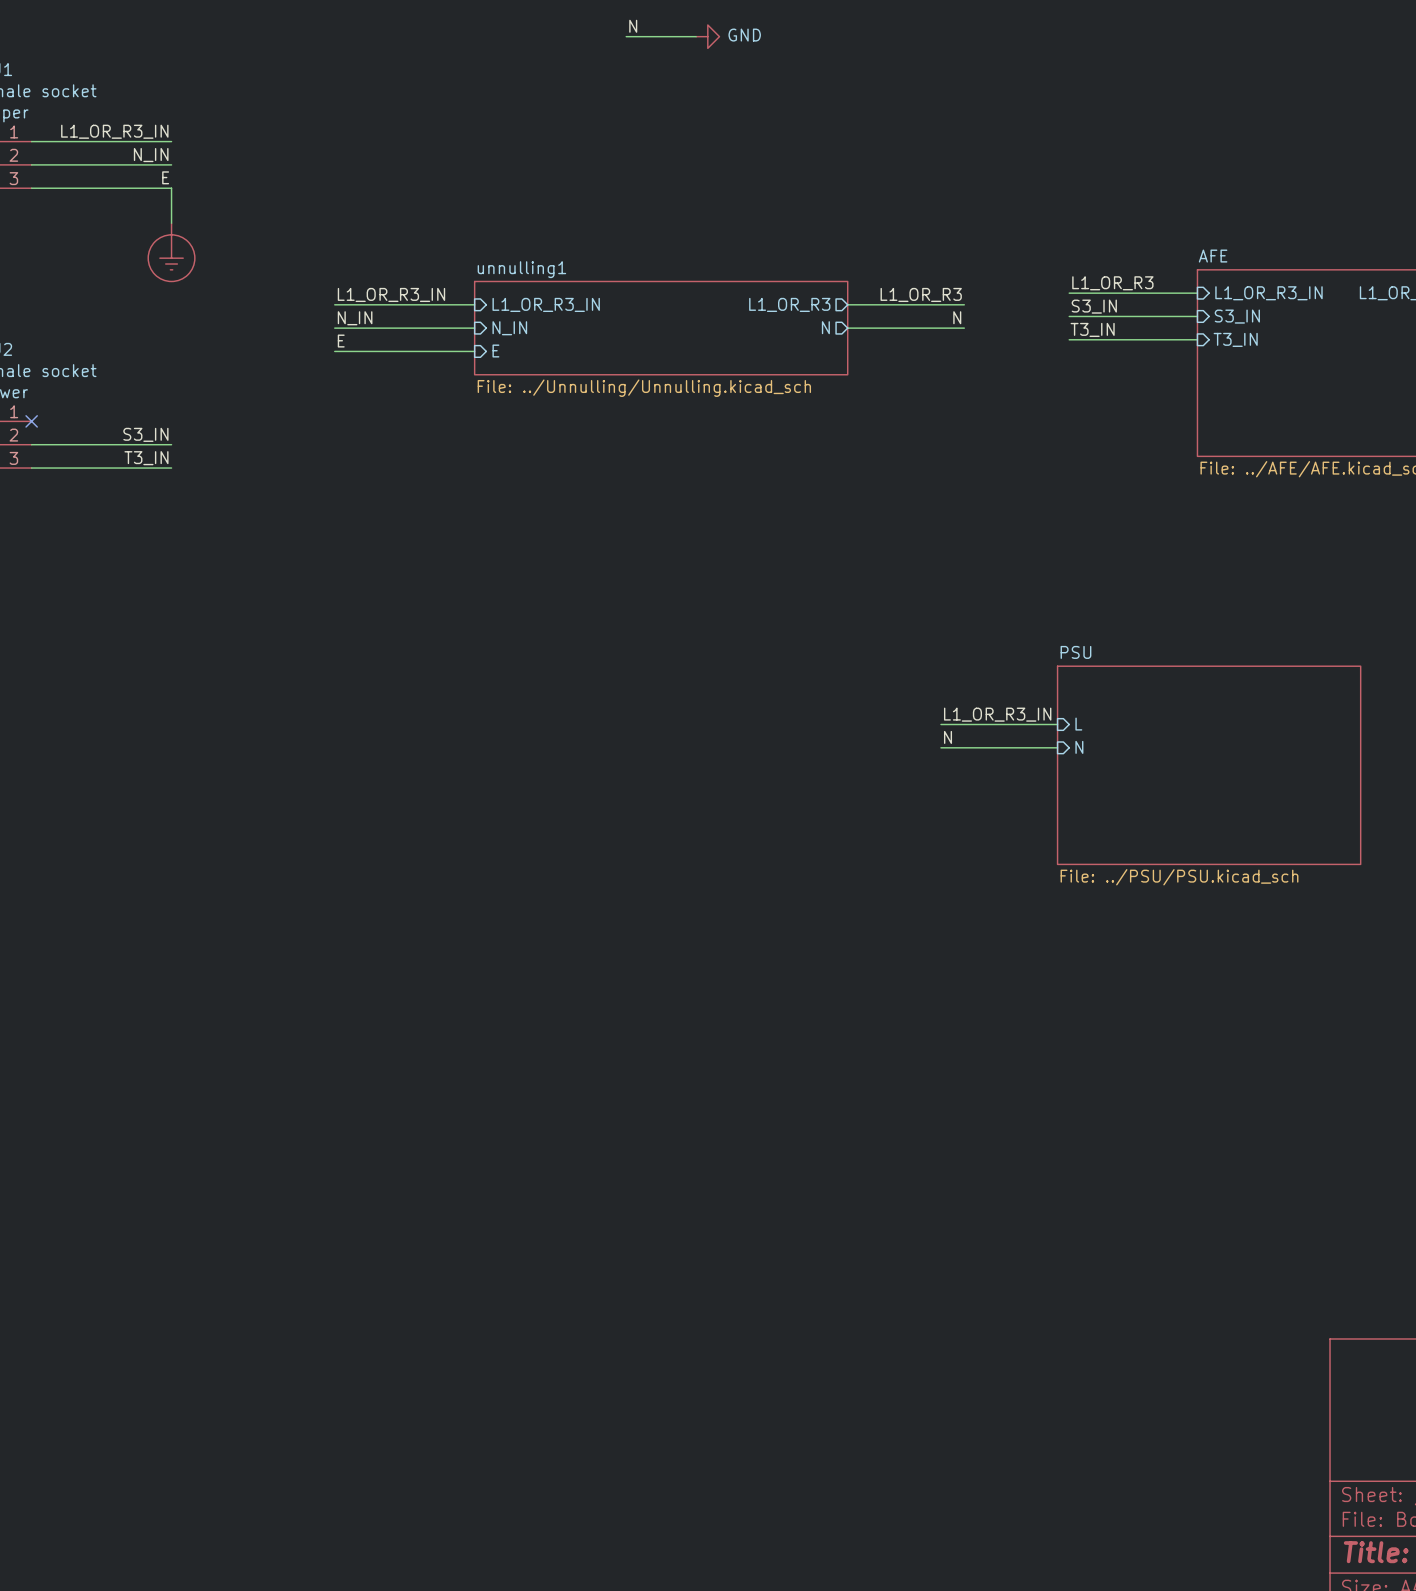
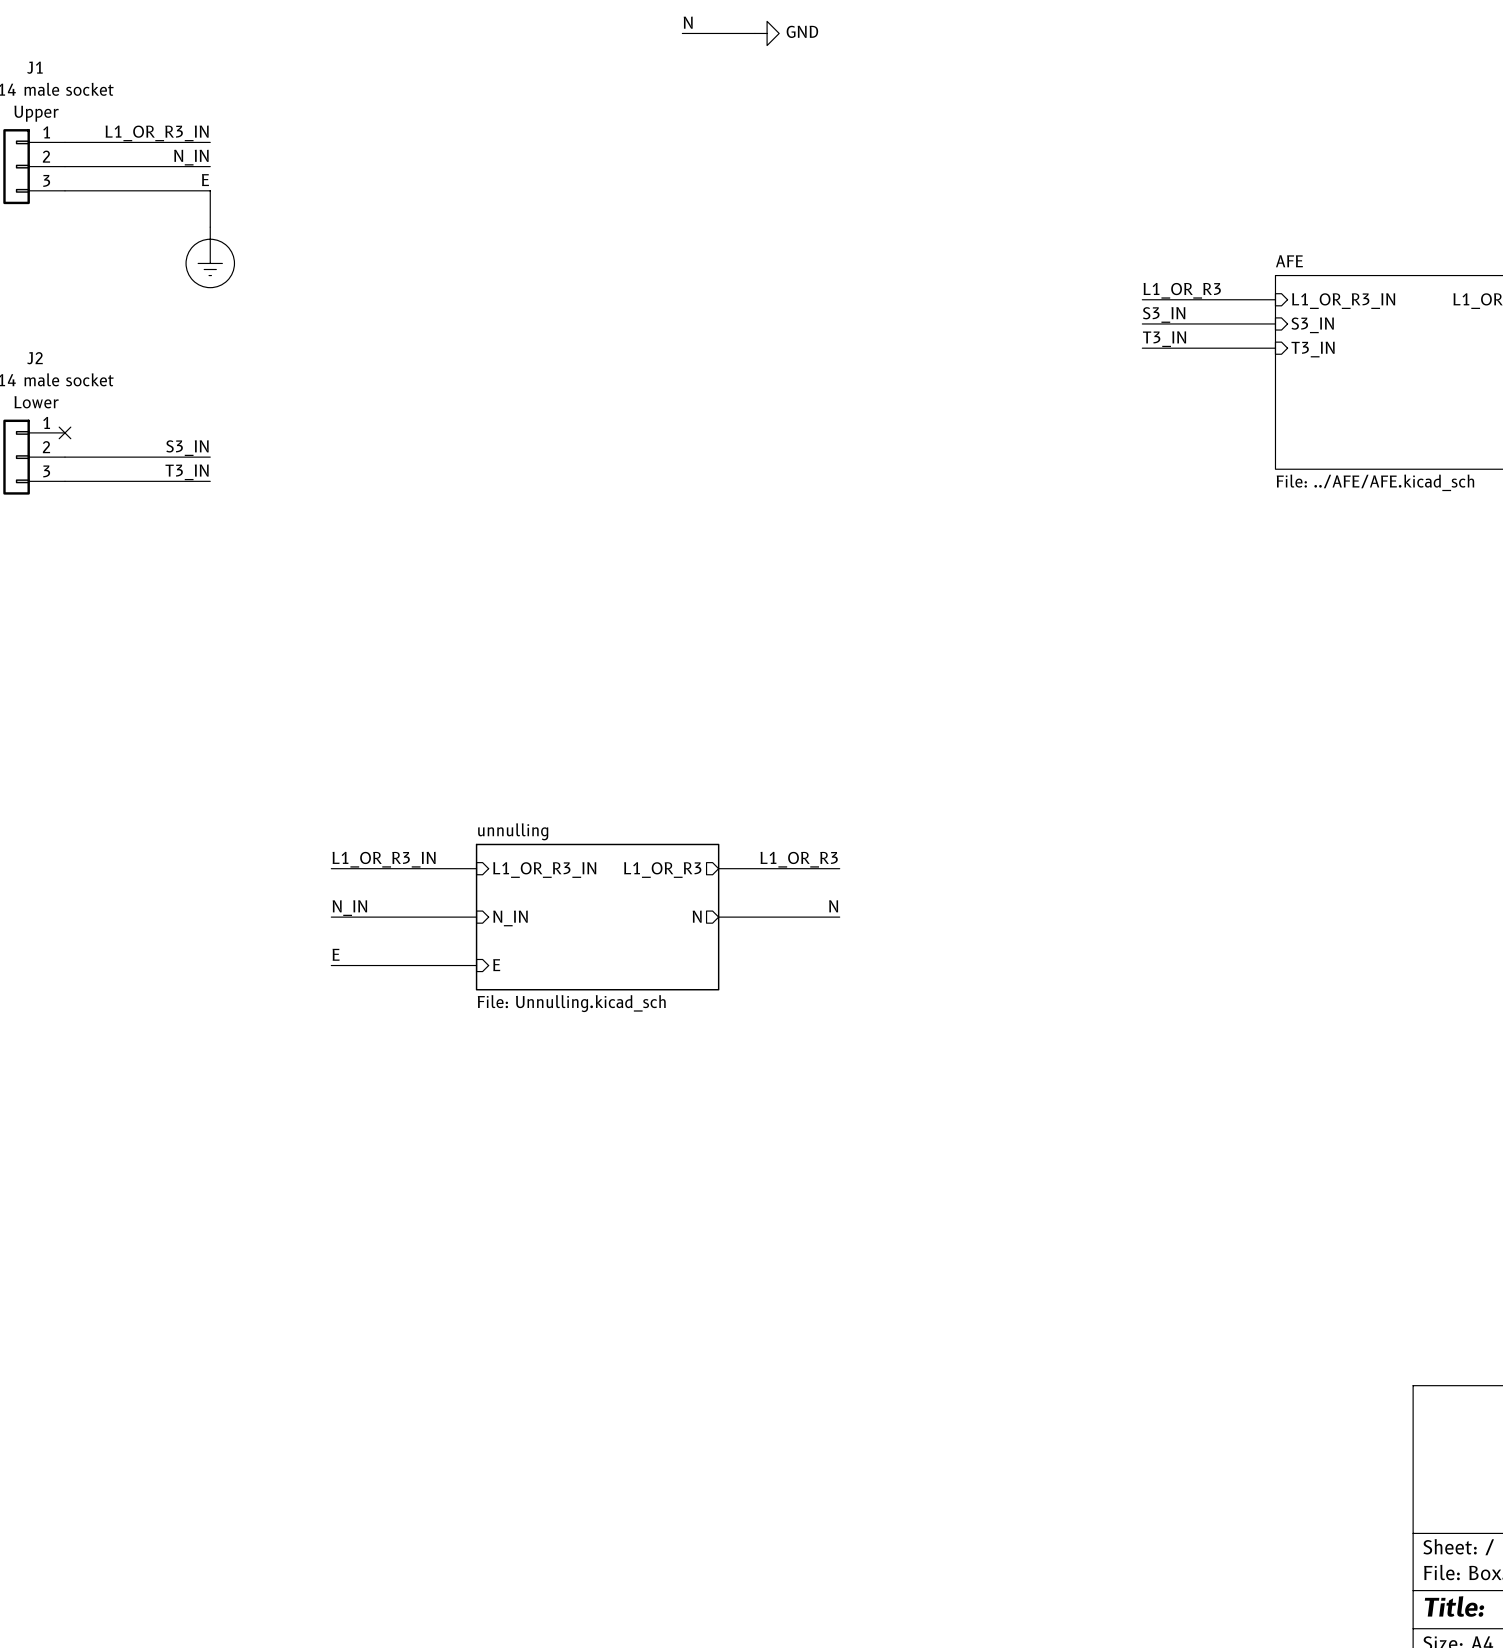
label: L1_OR_R3_IN (391, 294) -> none
label: L1_OR_R3 (921, 294) -> none
wire: (334, 304) (474, 304) -> none
sheet pin: L1_OR_R3_IN (546, 304) -> none
sheet pin: L1_OR_R3 (789, 304) -> none
wire: (847, 304) (964, 304) -> none
label: N (957, 317) -> none
label: N_IN (355, 318) -> none
sheet pin: N (825, 327) -> none
wire: (334, 328) (474, 328) -> none
sheet pin: N_IN (509, 328) -> none
sheet unnulling1: File: ../Unnulling/Unnulling.kicad_sch (661, 328) -> none
wire: (847, 328) (964, 328) -> none
label: E (341, 341) -> none
wire: (334, 351) (474, 351) -> none
sheet pin: E (495, 351) -> none
label: L1_OR_R3_IN (997, 714) -> none
wire: (940, 724) (1057, 724) -> none
sheet pin: L (1078, 724) -> none
label position: N (948, 737) -> N (833, 906)
wire: (940, 747) (1057, 747) -> none
sheet pin: N (1079, 747) -> none
sheet PSU: File: ../PSU/PSU.kicad_sch (1209, 765) -> none
label: none -> L1_OR_R3_IN (384, 859)
label: none -> L1_OR_R3 (799, 859)
wire: none -> (331, 868) (476, 868)
sheet pin: none -> L1_OR_R3_IN (544, 870)
sheet pin: none -> L1_OR_R3 (662, 870)
wire: none -> (718, 868) (839, 868)
label: none -> N_IN (349, 908)
wire: none -> (331, 917) (476, 917)
sheet pin: none -> N_IN (510, 918)
sheet unnulling: none -> File: Unnulling.kicad_sch (597, 917)
sheet pin: none -> N (697, 916)
wire: none -> (718, 917) (839, 917)
label: none -> E (336, 954)
sheet pin: none -> E (496, 965)
wire: none -> (331, 965) (476, 965)

